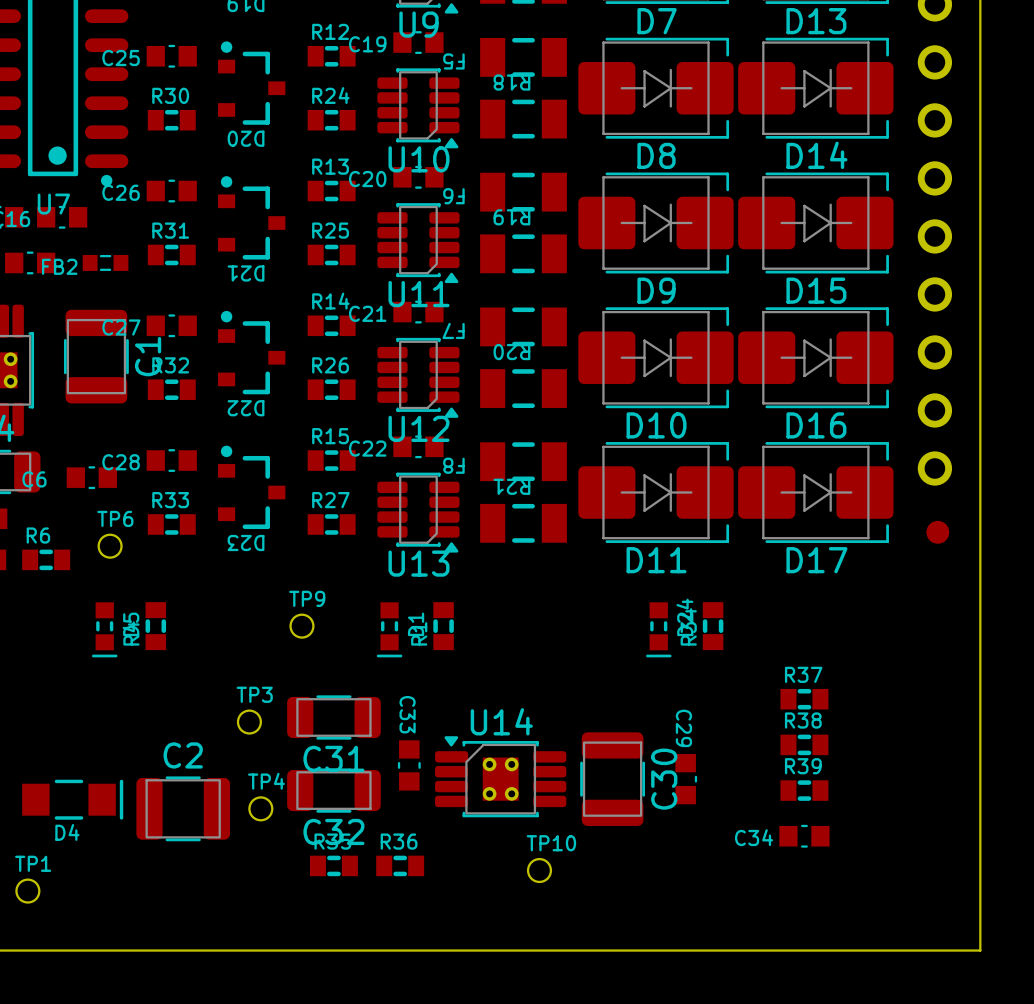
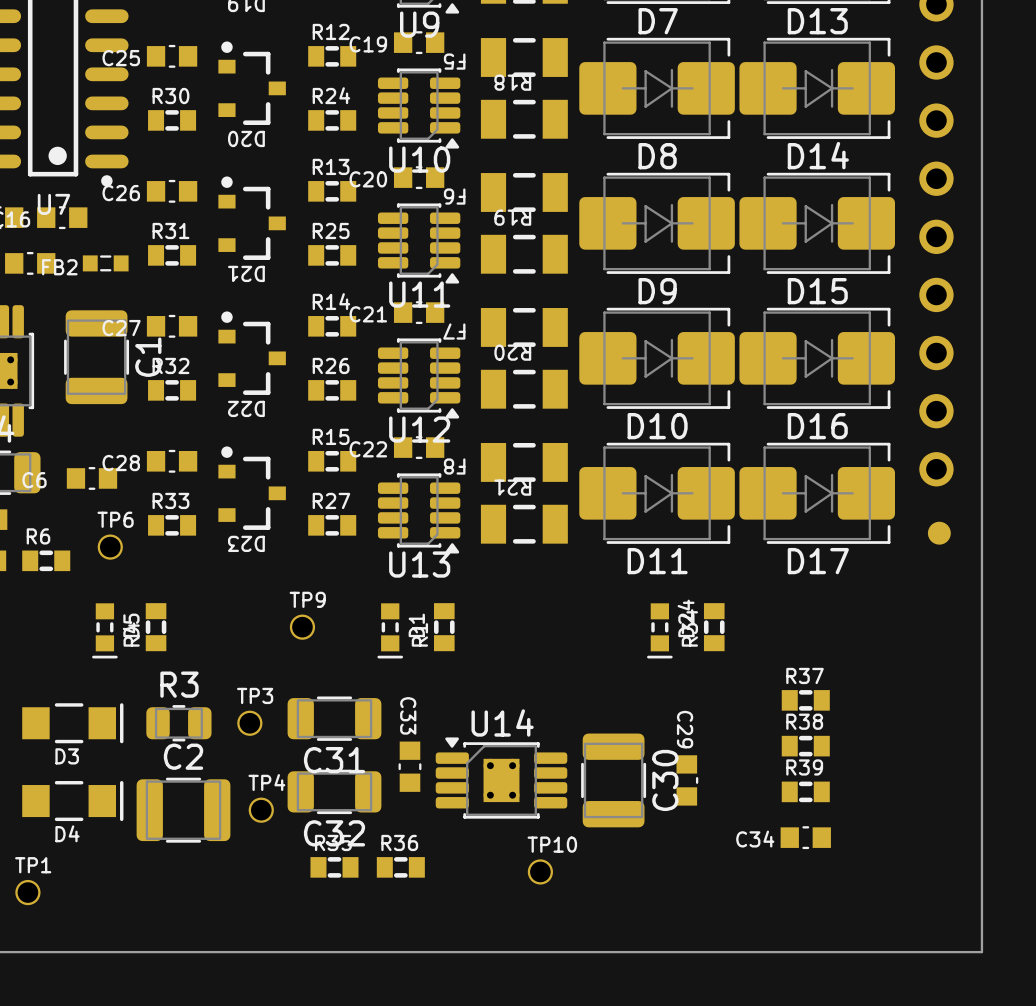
D3: none -> (72, 723)
R3: none -> (178, 723)

